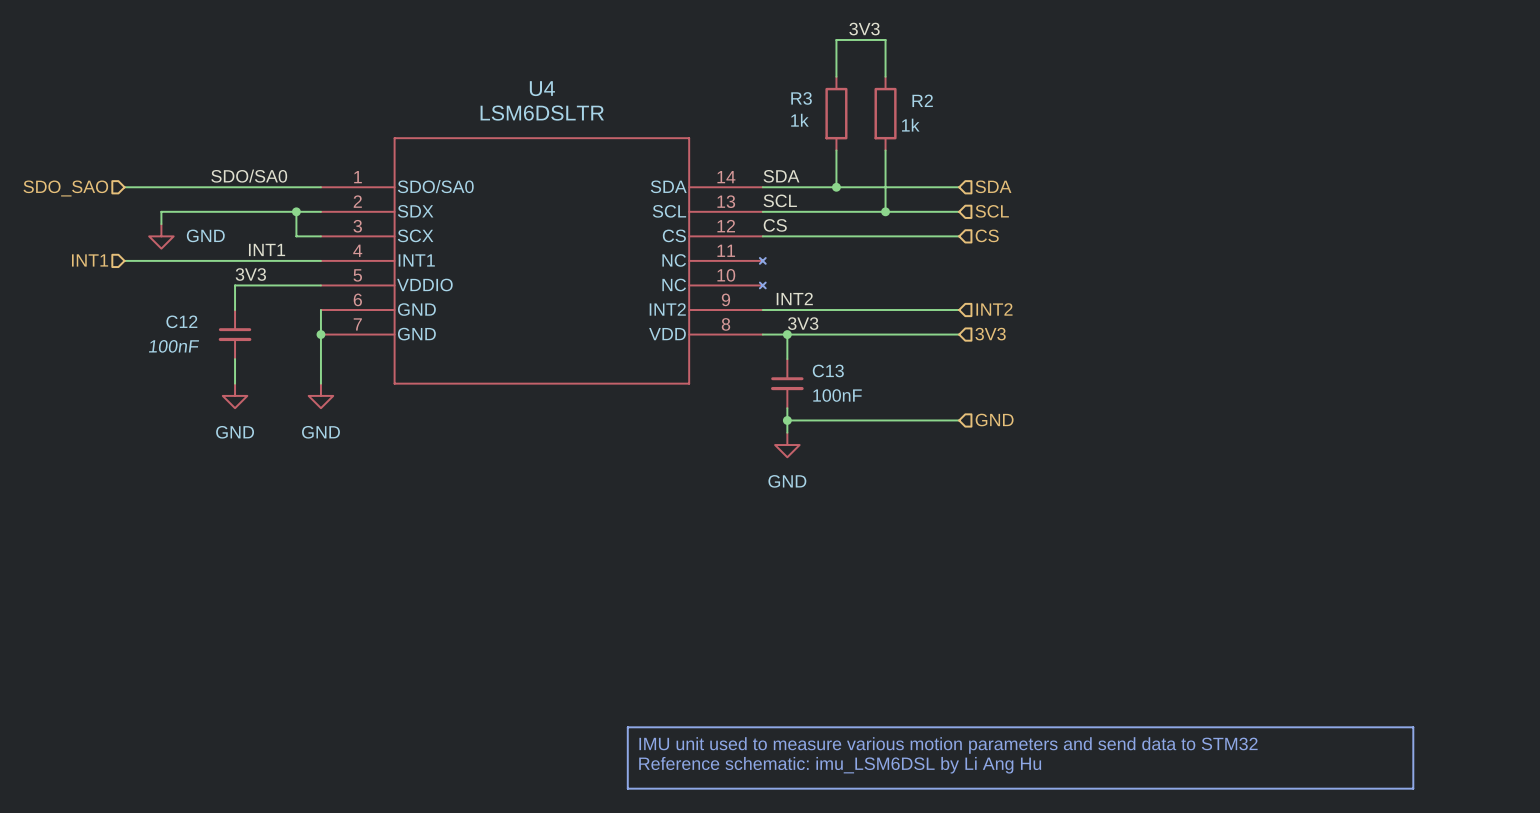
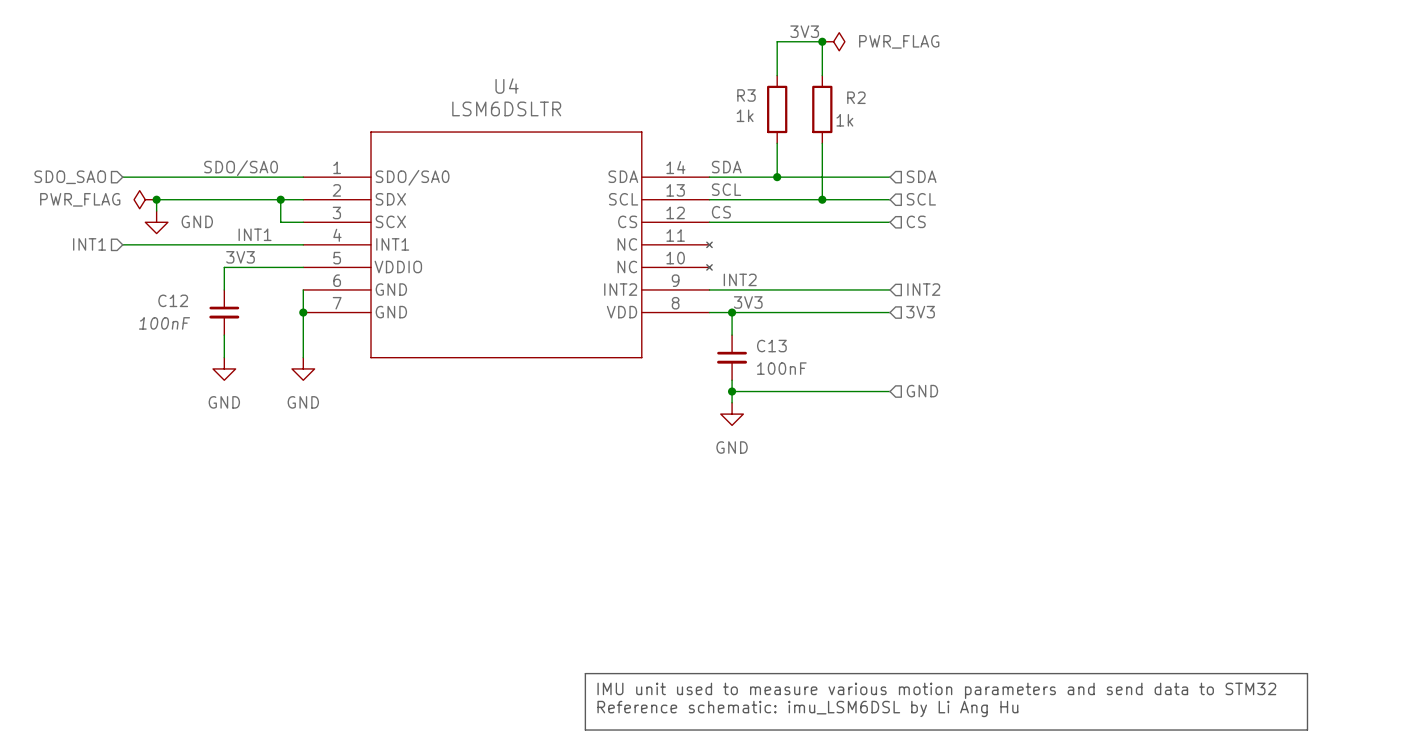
junction: none -> (822, 41)
power symbol: none -> PWR_FLAG (833, 41)
power symbol: none -> PWR_FLAG (145, 199)
junction: none -> (156, 199)

